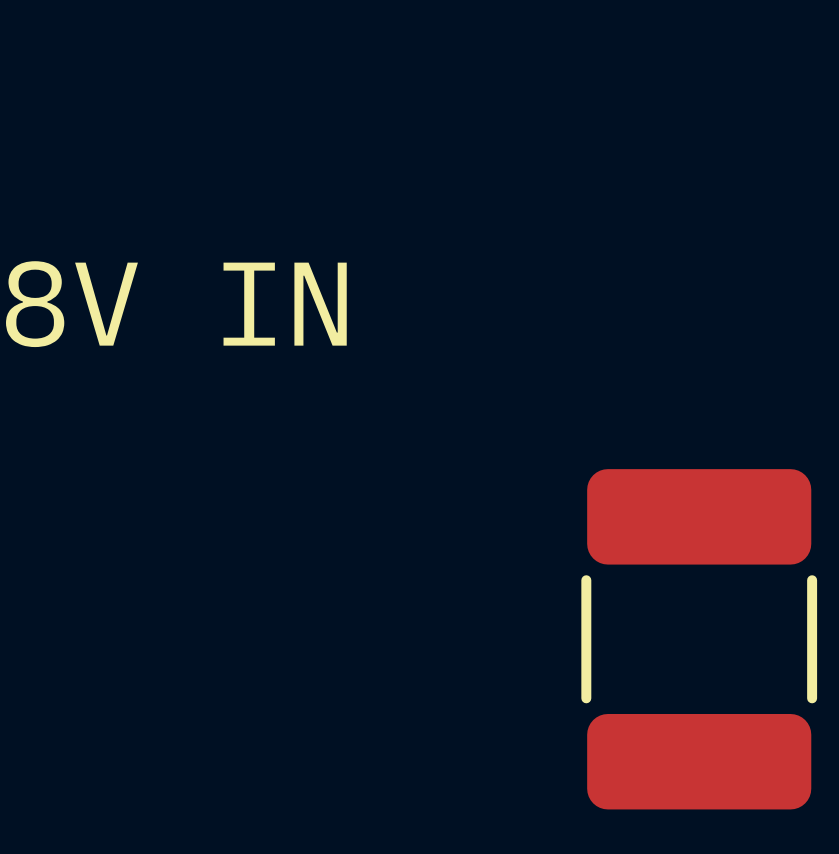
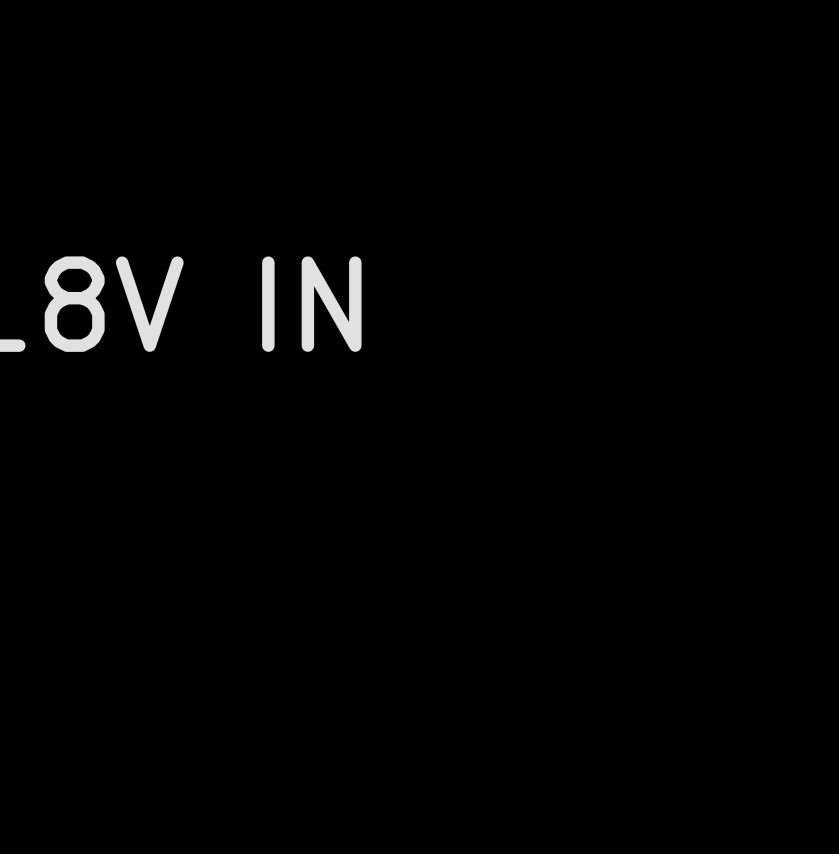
part: (699, 639) -> none

